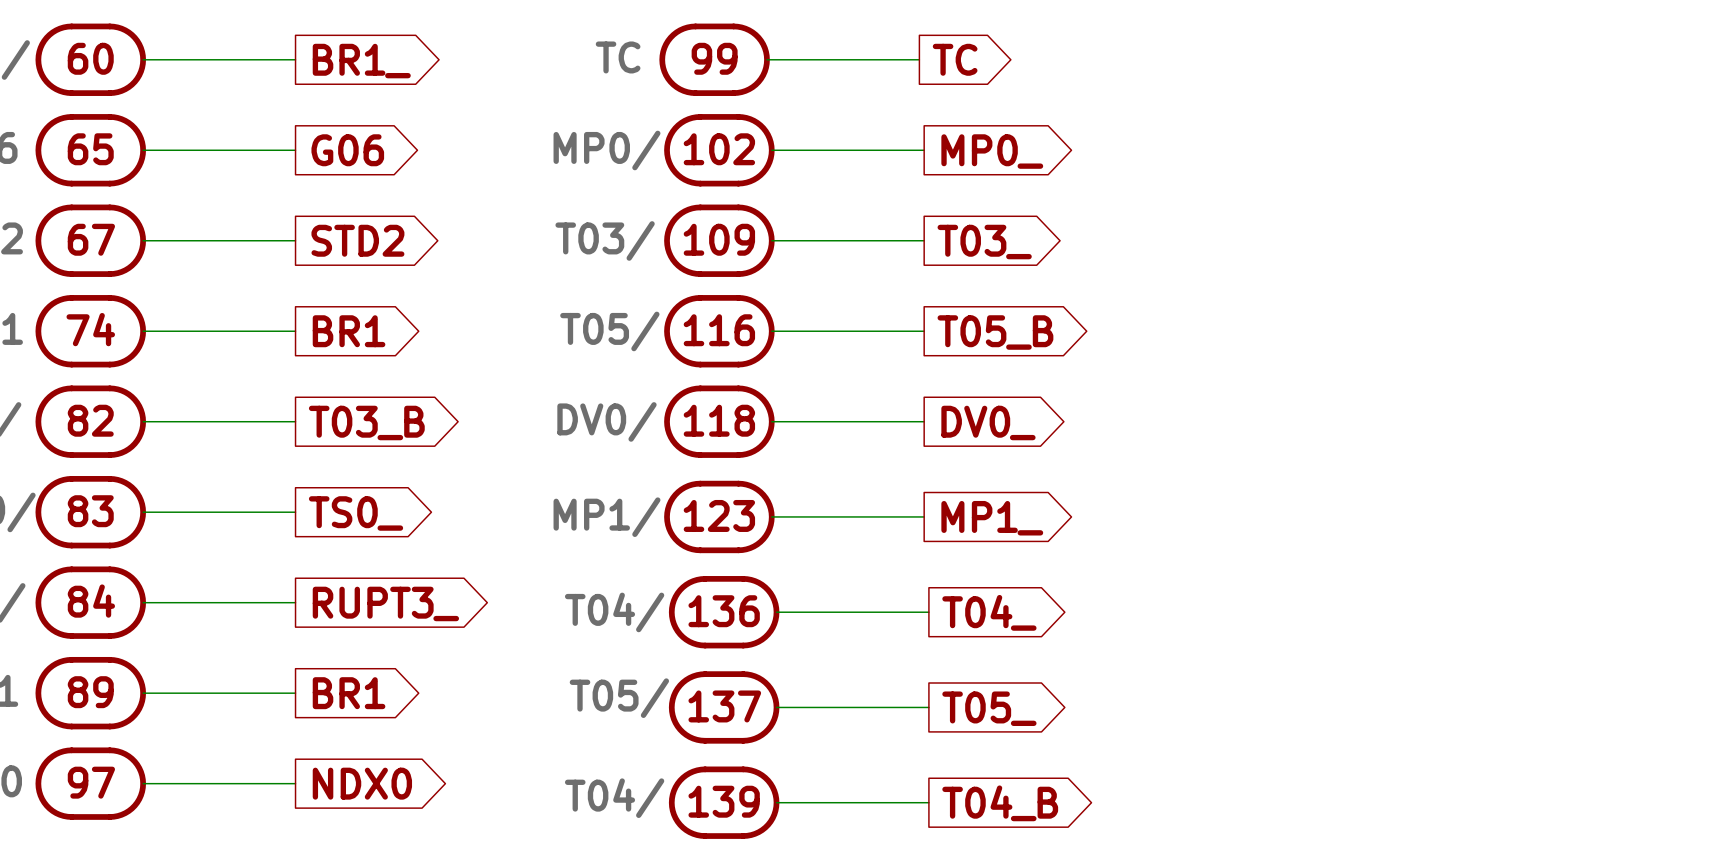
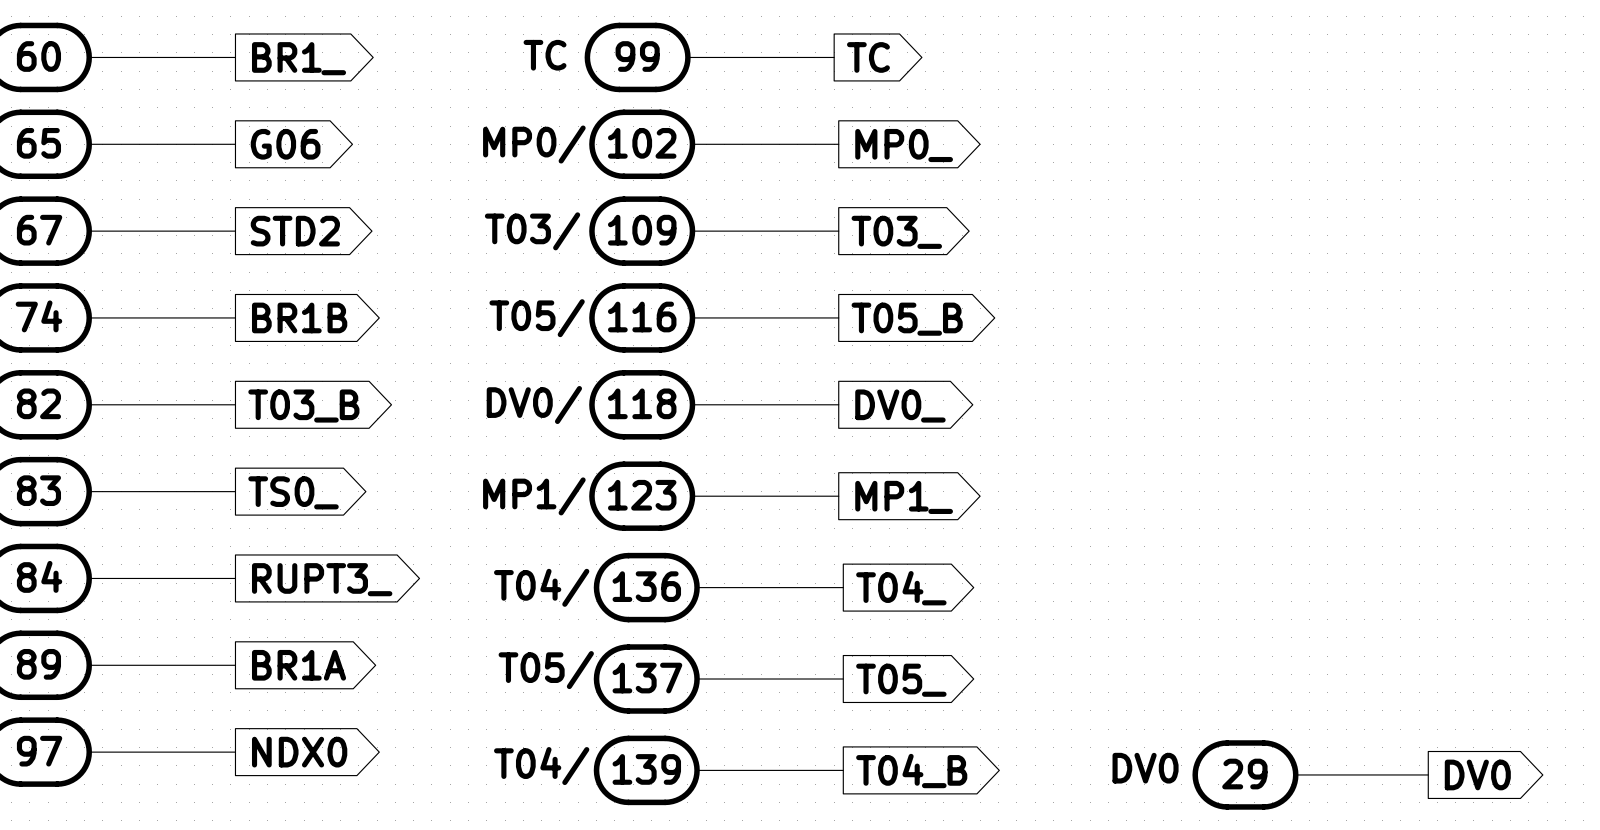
global label: BR1 (349, 331) -> BR1B (299, 317)
global label: BR1 (349, 693) -> BR1A (299, 665)
part: none -> (1245, 774)
wire: none -> (1295, 774) (1428, 774)
global label: none -> DV0 (1477, 774)

